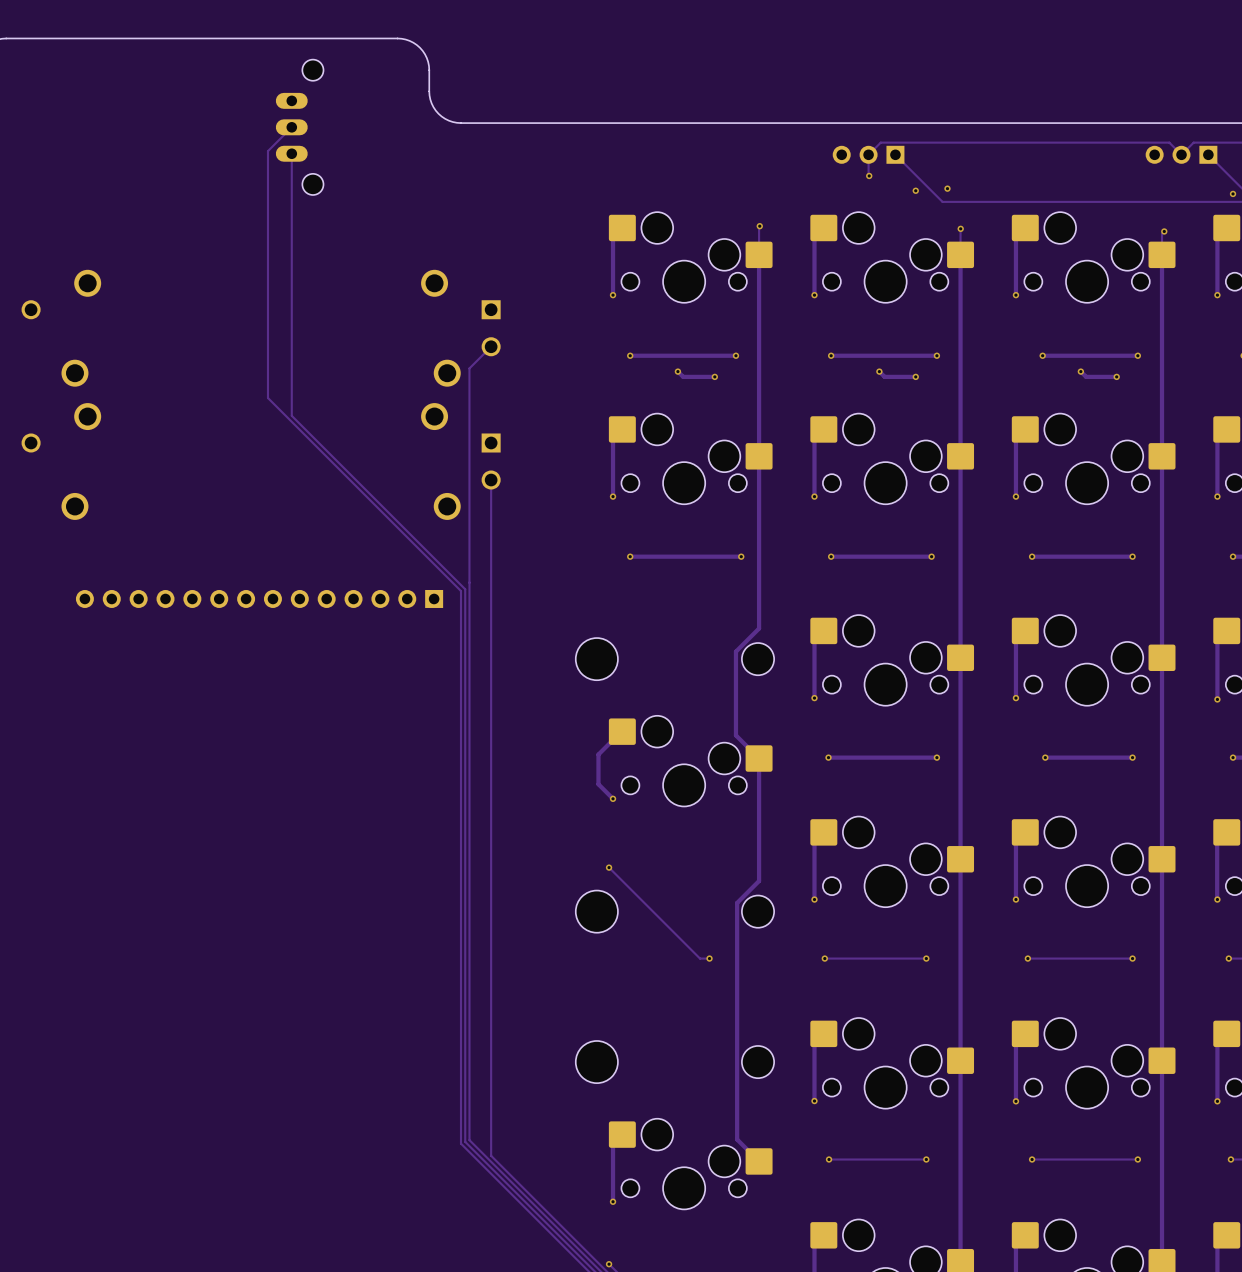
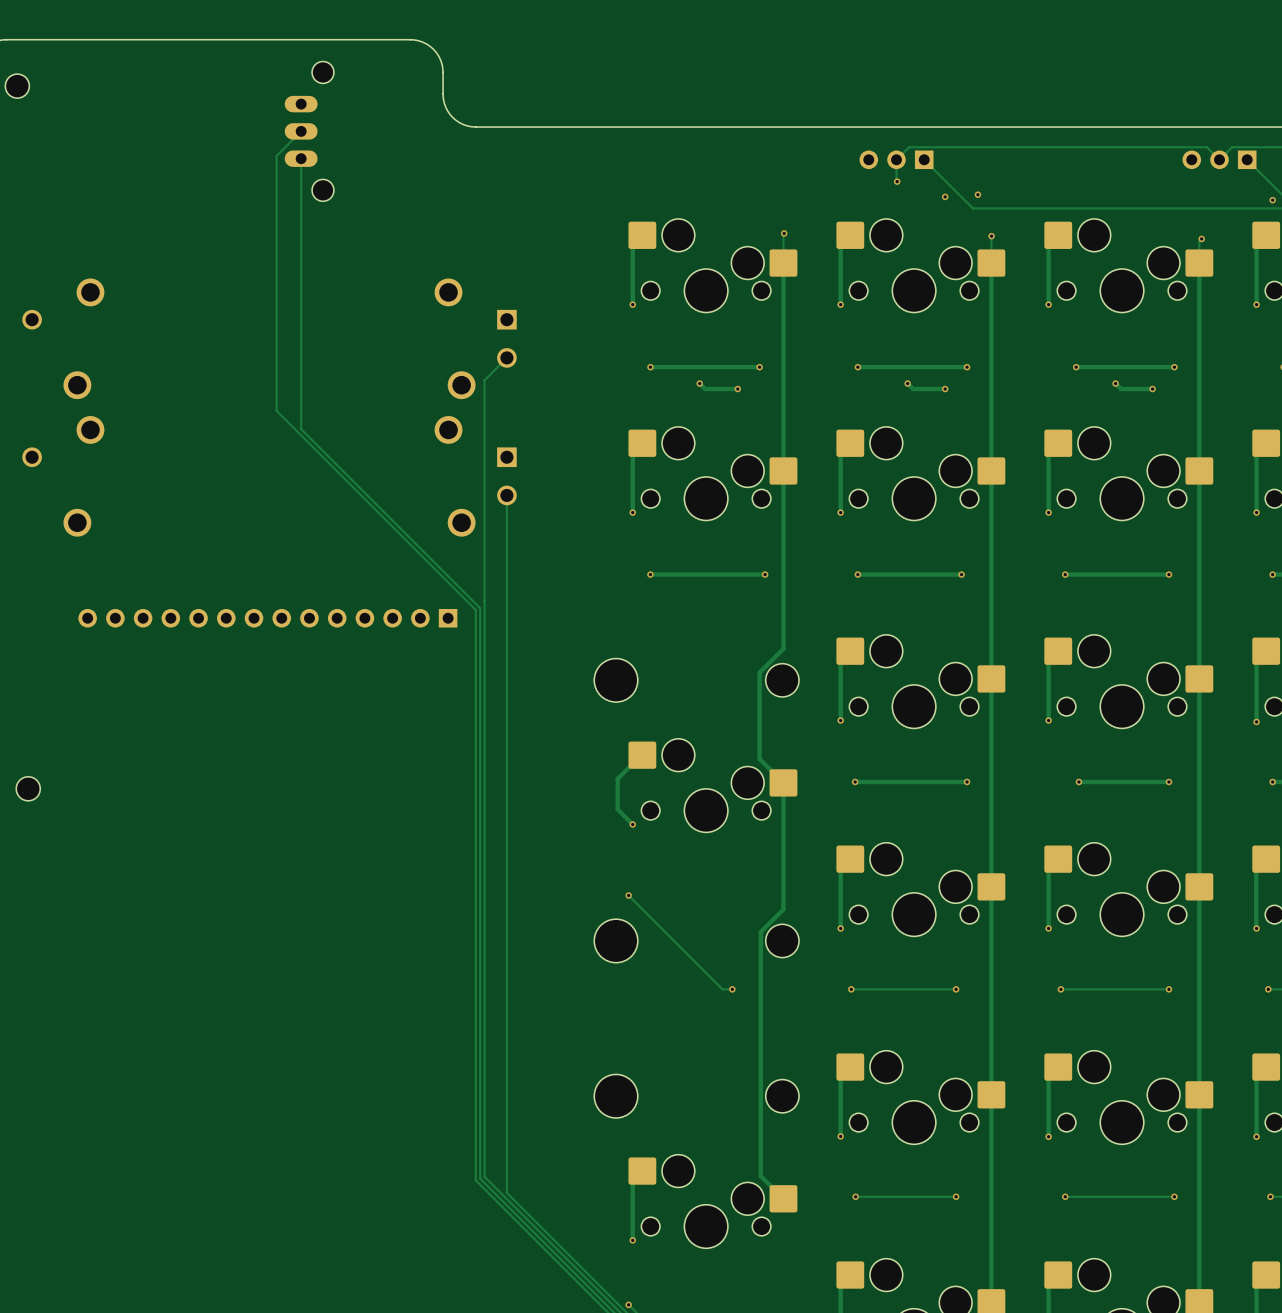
part: none -> (17, 86)
part: none -> (28, 788)

